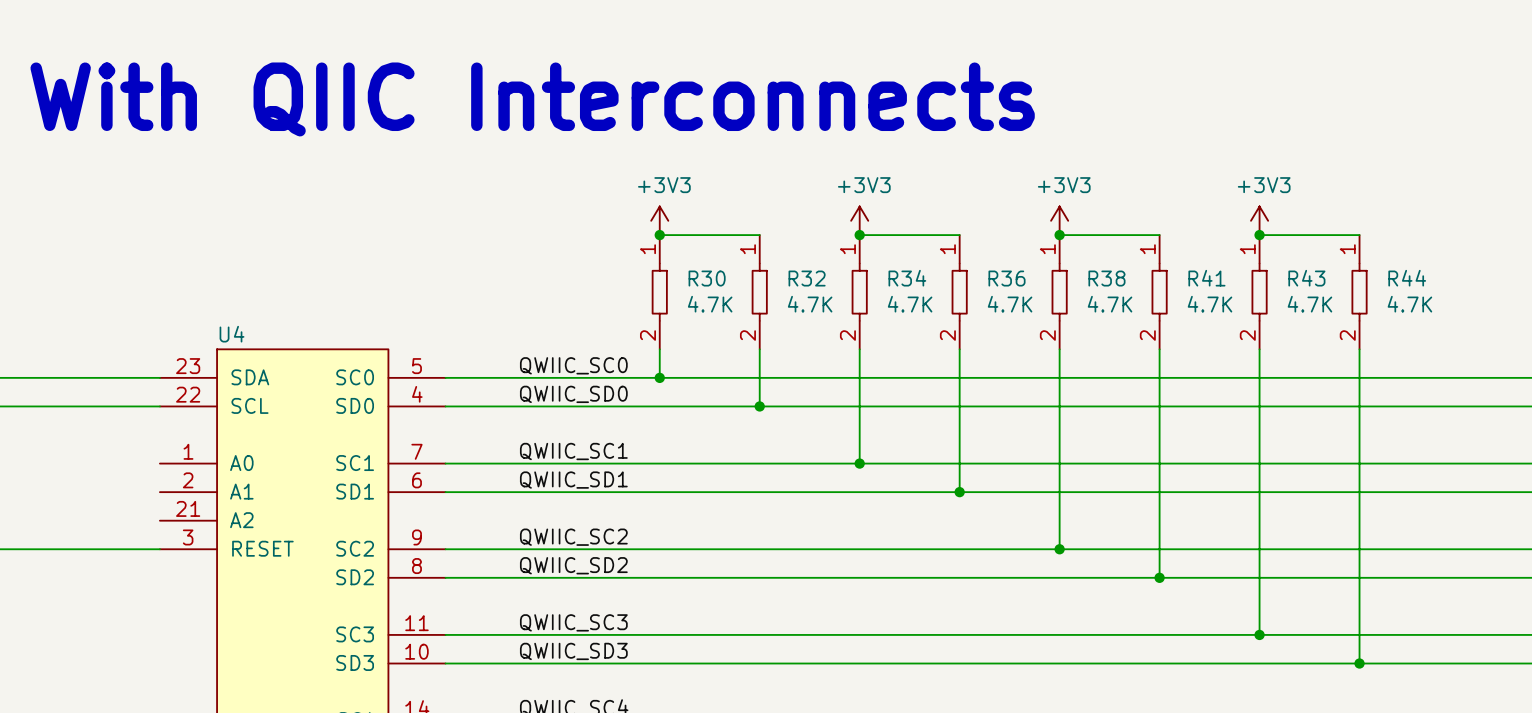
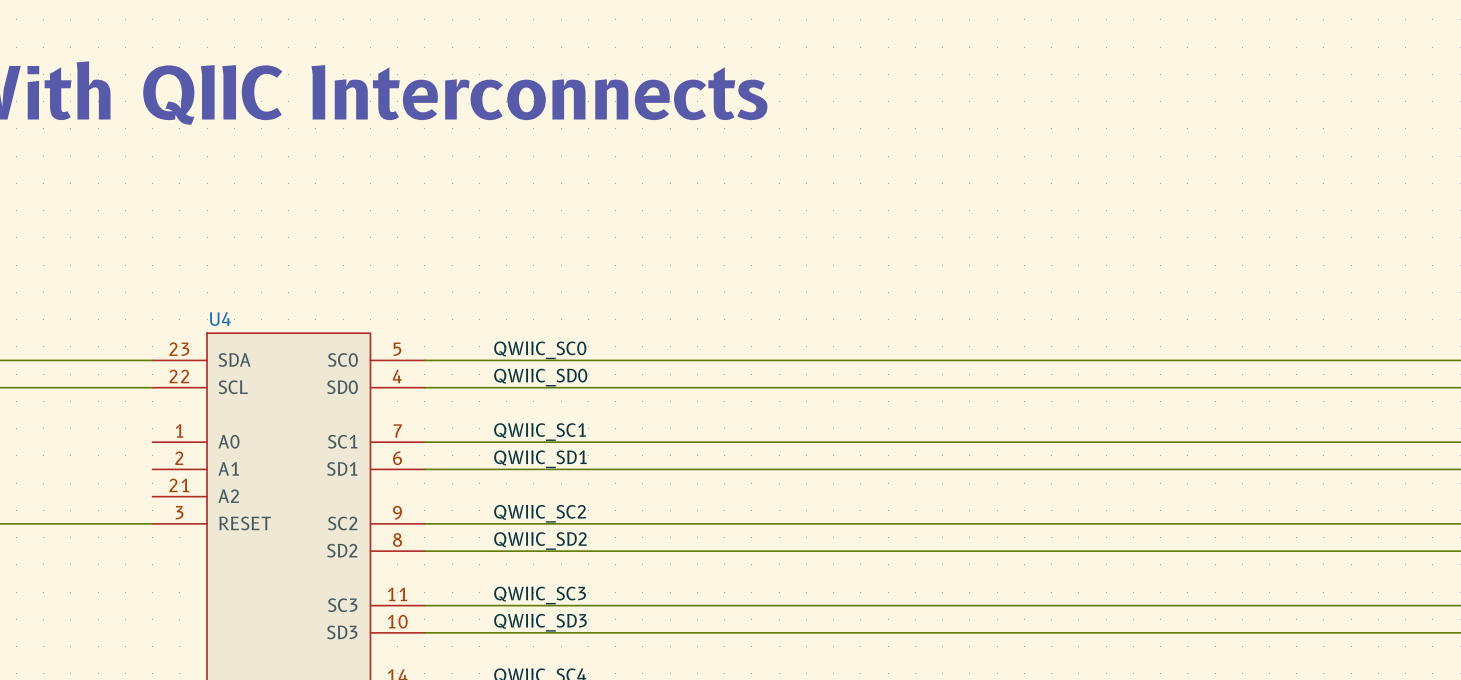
power symbol: +3V3 (659, 220) -> none
power symbol: +3V3 (859, 220) -> none
power symbol: +3V3 (1059, 220) -> none
power symbol: +3V3 (1259, 220) -> none
wire: (659, 235) (759, 235) -> none
junction: (659, 235) -> none
wire: (859, 235) (959, 235) -> none
junction: (859, 235) -> none
wire: (1059, 235) (1159, 235) -> none
junction: (1059, 235) -> none
wire: (1259, 235) (1359, 235) -> none
junction: (1259, 235) -> none
R30: (659, 292) -> none
R32: (759, 292) -> none
R34: (859, 292) -> none
R36: (959, 292) -> none
R38: (1059, 292) -> none
R41: (1159, 292) -> none
R43: (1259, 292) -> none
R44: (1359, 292) -> none
wire: (659, 349) (659, 377) -> none
wire: (759, 349) (759, 406) -> none
wire: (859, 349) (859, 463) -> none
wire: (959, 349) (959, 492) -> none
wire: (1059, 349) (1059, 549) -> none
wire: (1159, 349) (1159, 577) -> none
wire: (1259, 349) (1259, 634) -> none
wire: (1359, 349) (1359, 663) -> none
junction: (659, 377) -> none
junction: (759, 406) -> none
junction: (859, 463) -> none
junction: (959, 492) -> none
junction: (1059, 549) -> none
junction: (1159, 577) -> none
junction: (1259, 634) -> none
junction: (1359, 663) -> none

